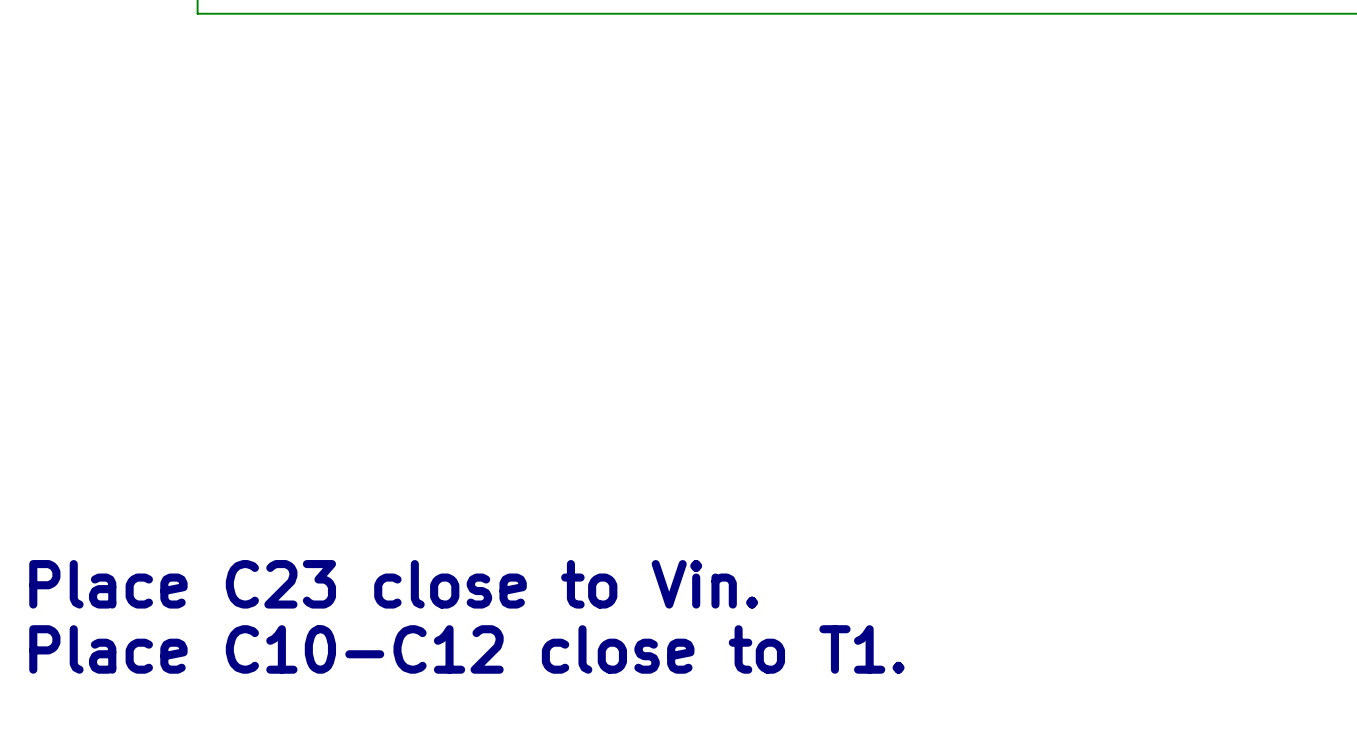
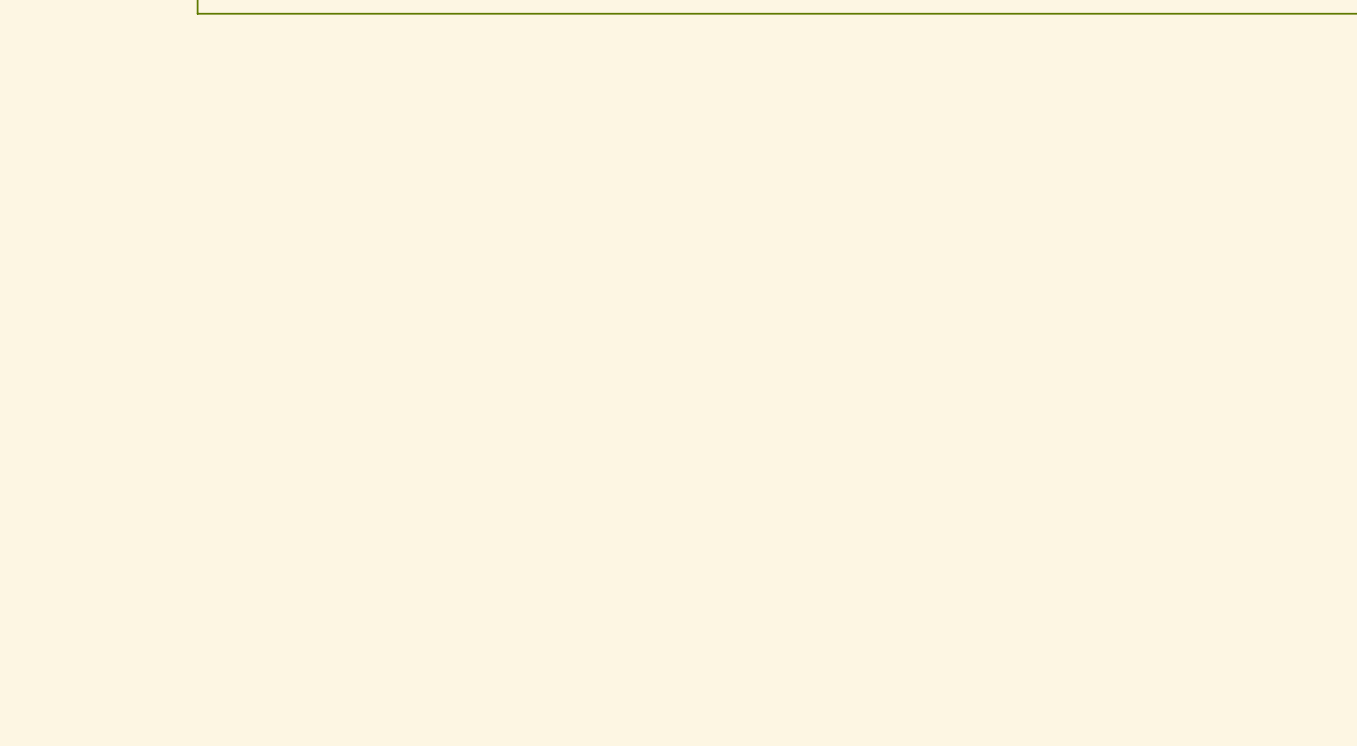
text: Place C23 close to Vin. (393, 584) -> none
text: Place C10-C12 close to T1. (466, 649) -> none

